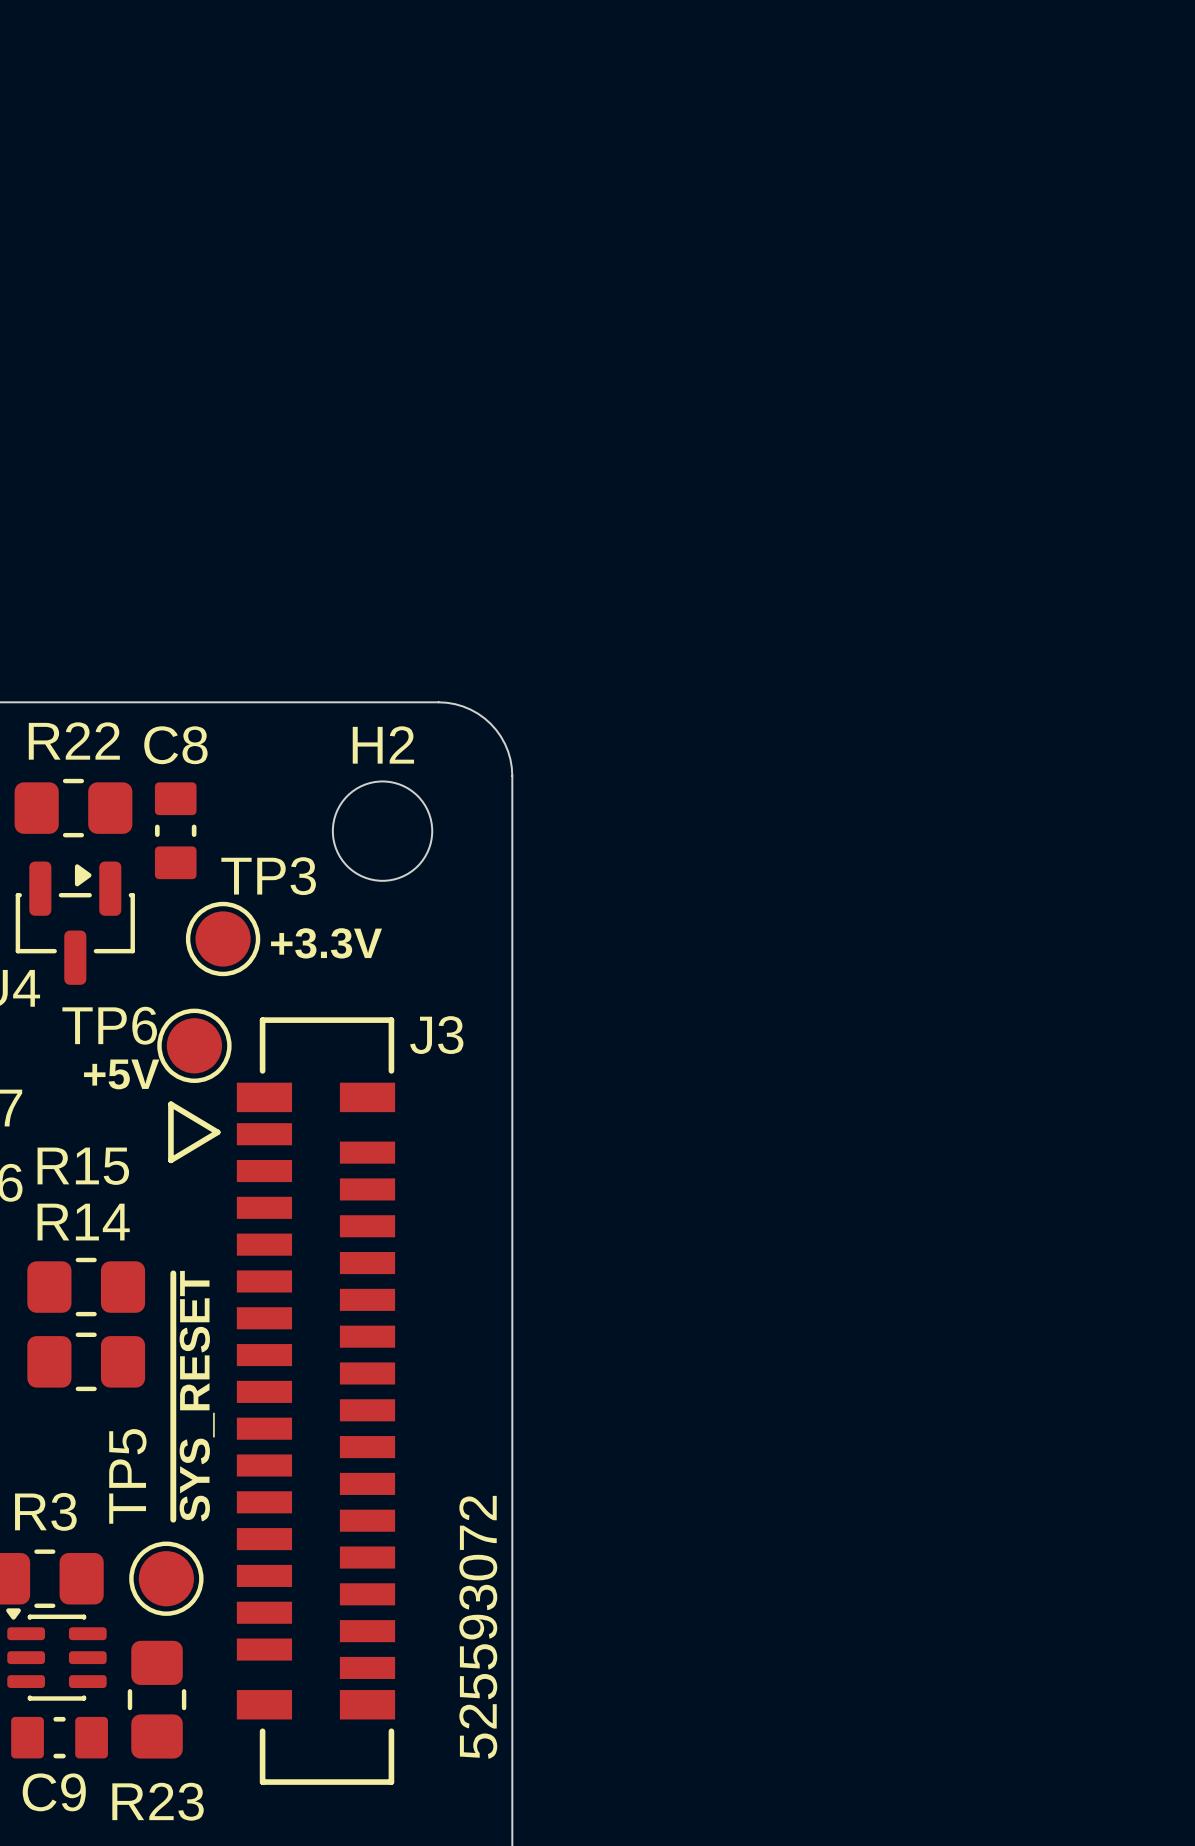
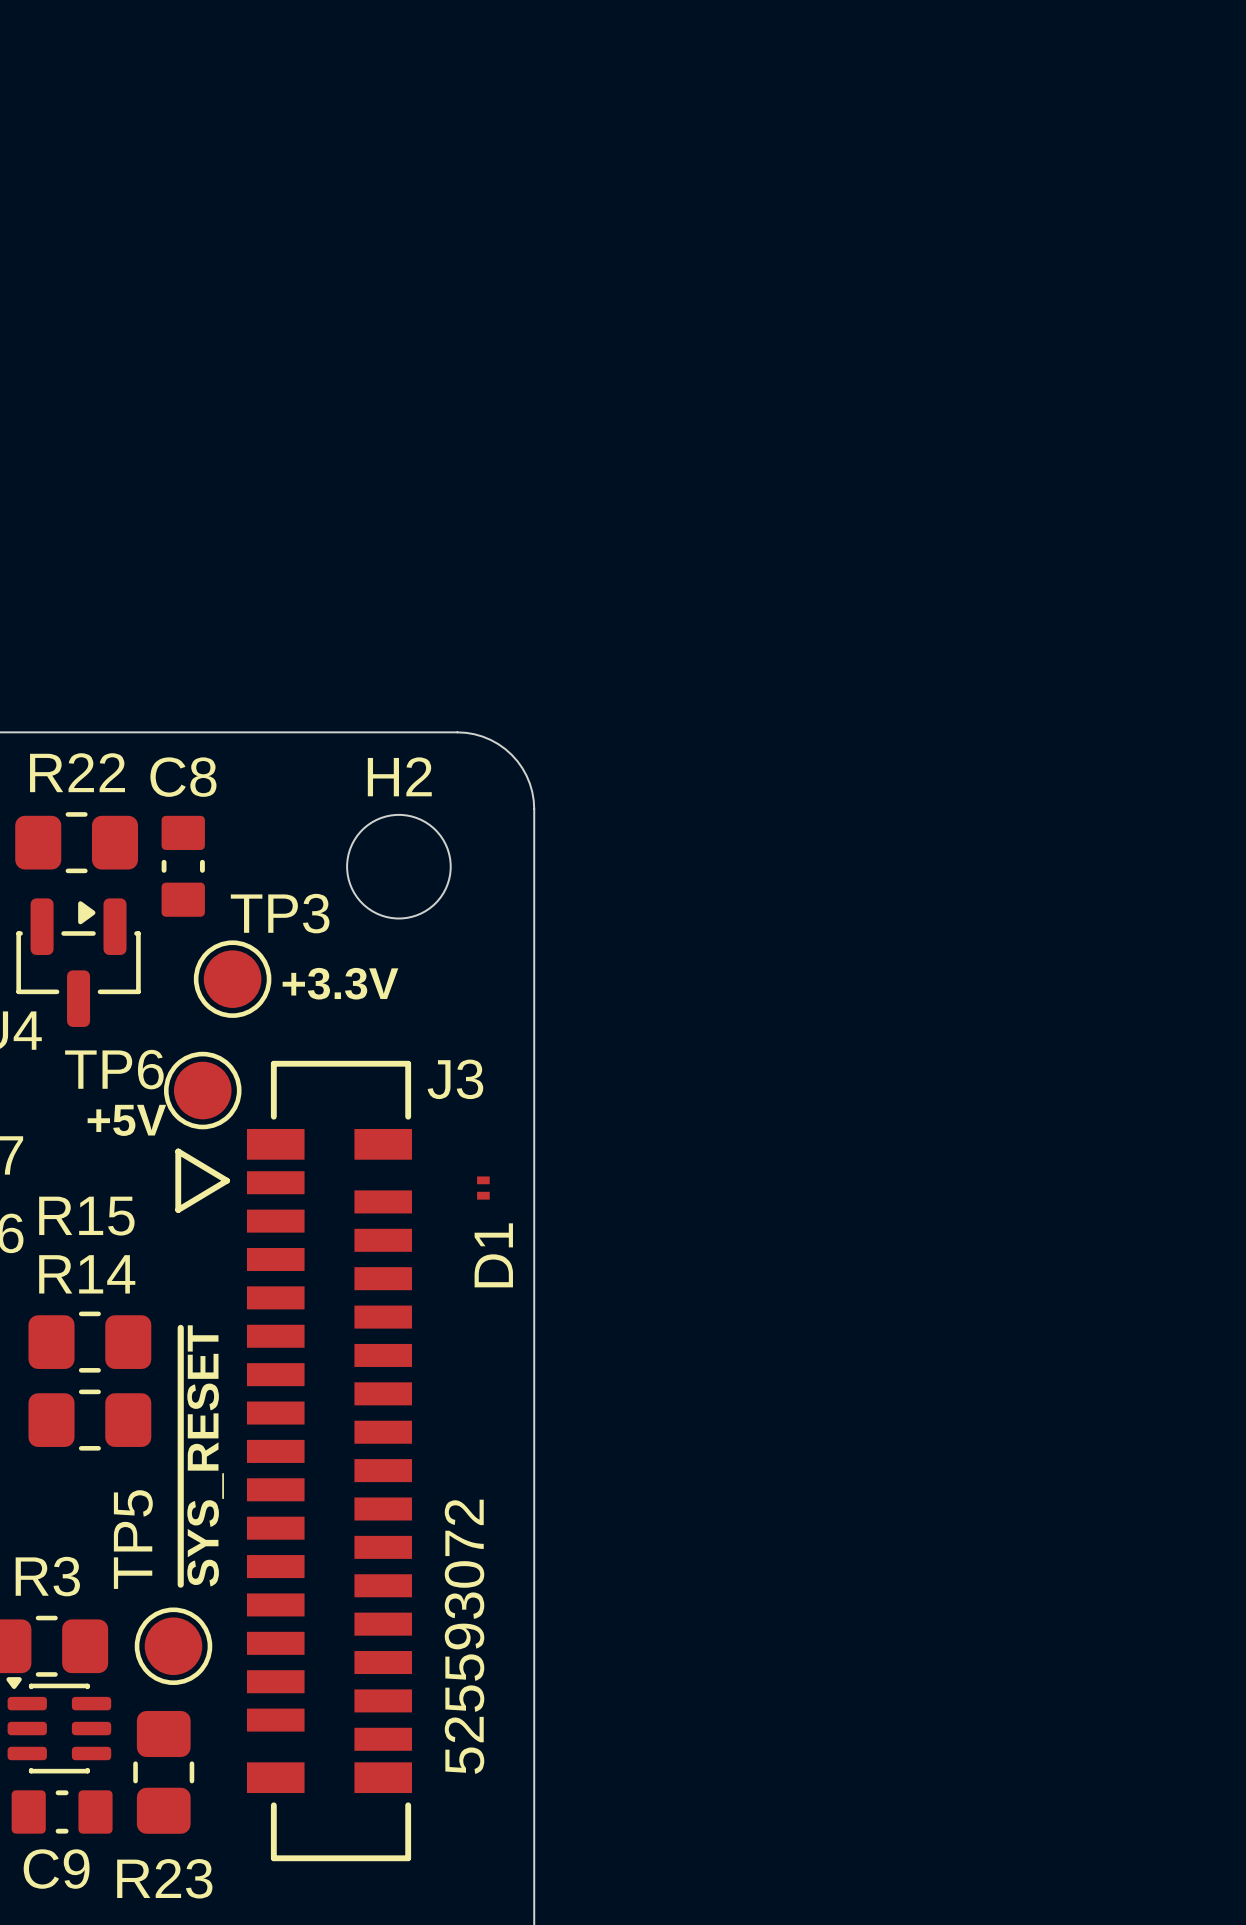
D1: none -> (483, 1188)
J3 text position: 525593072 (478, 1627) -> 525593072 (464, 1636)

